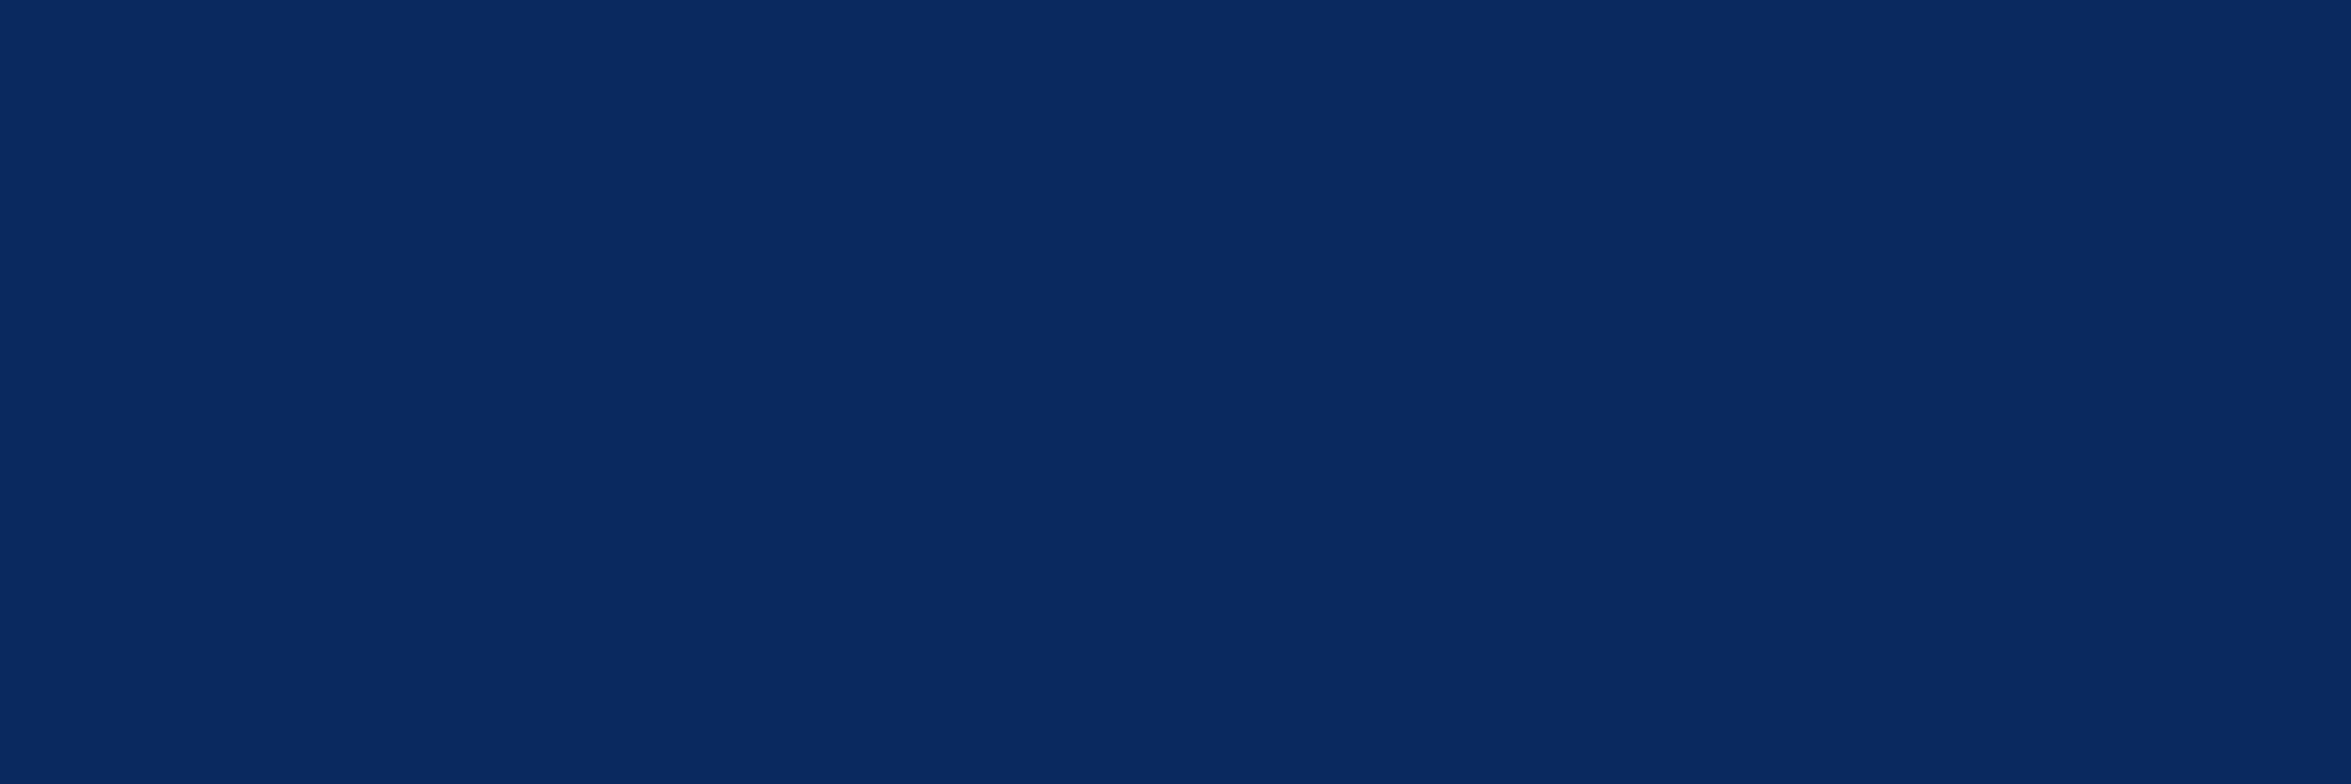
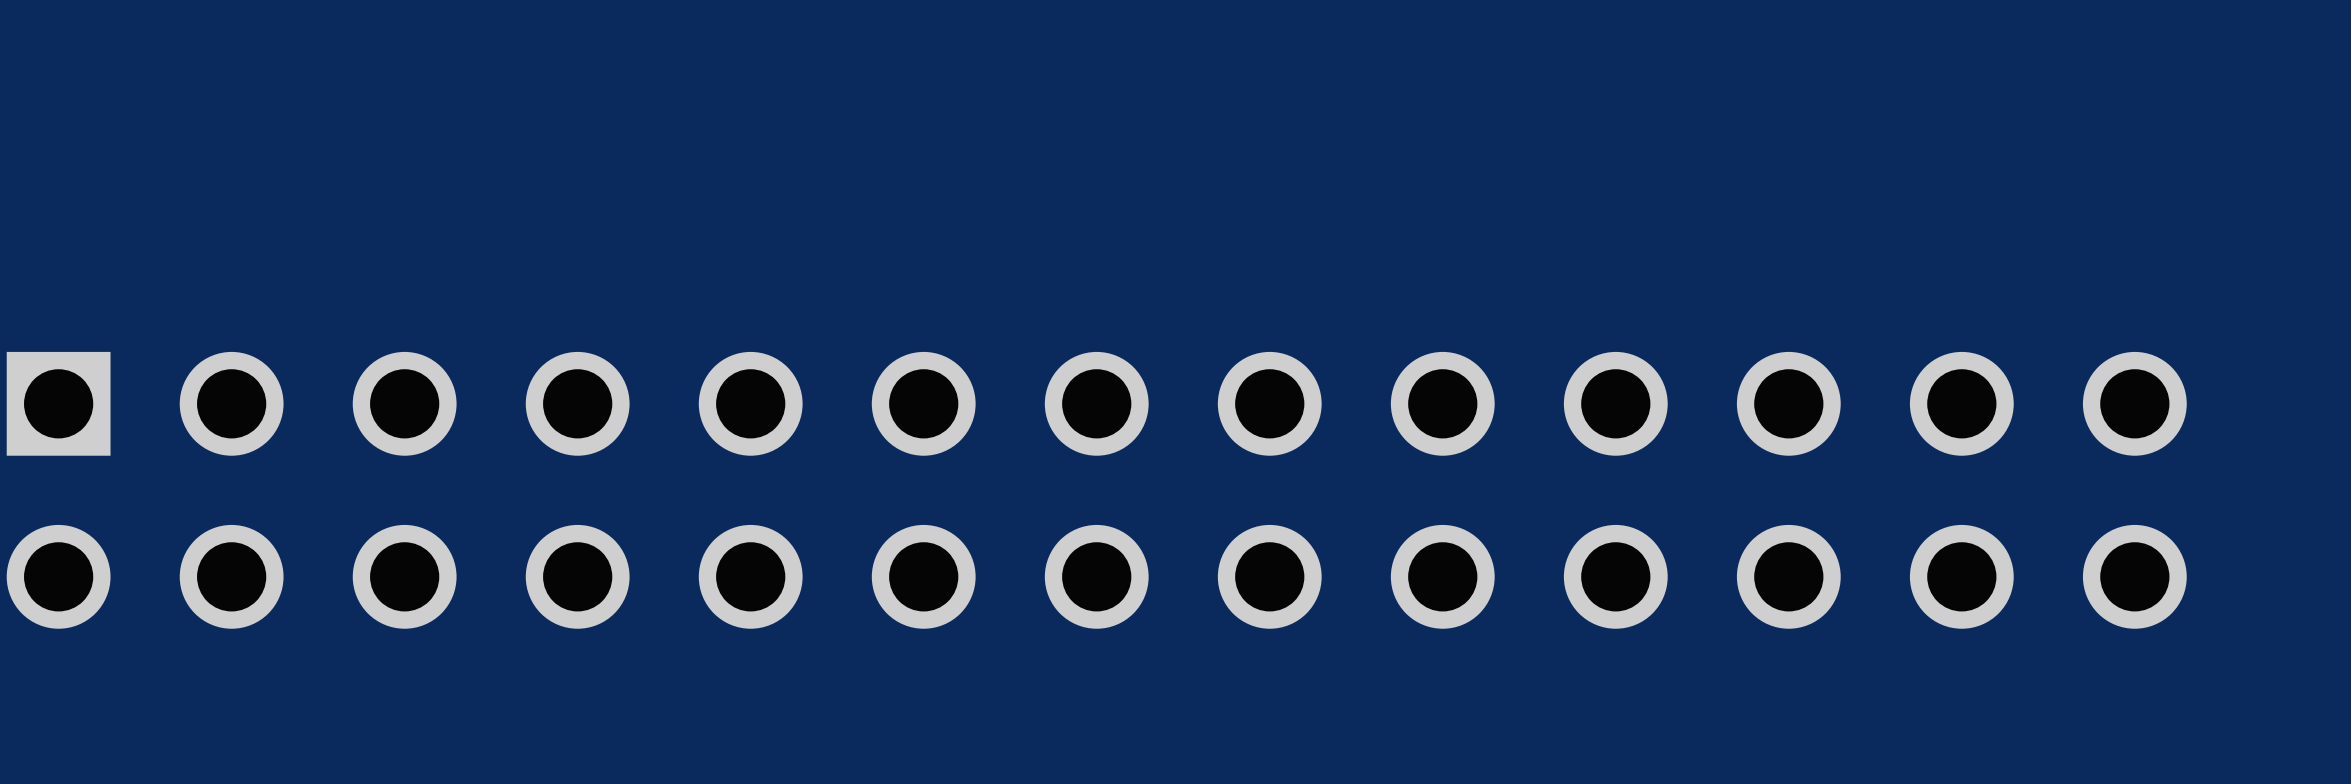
part: none -> (1096, 490)

